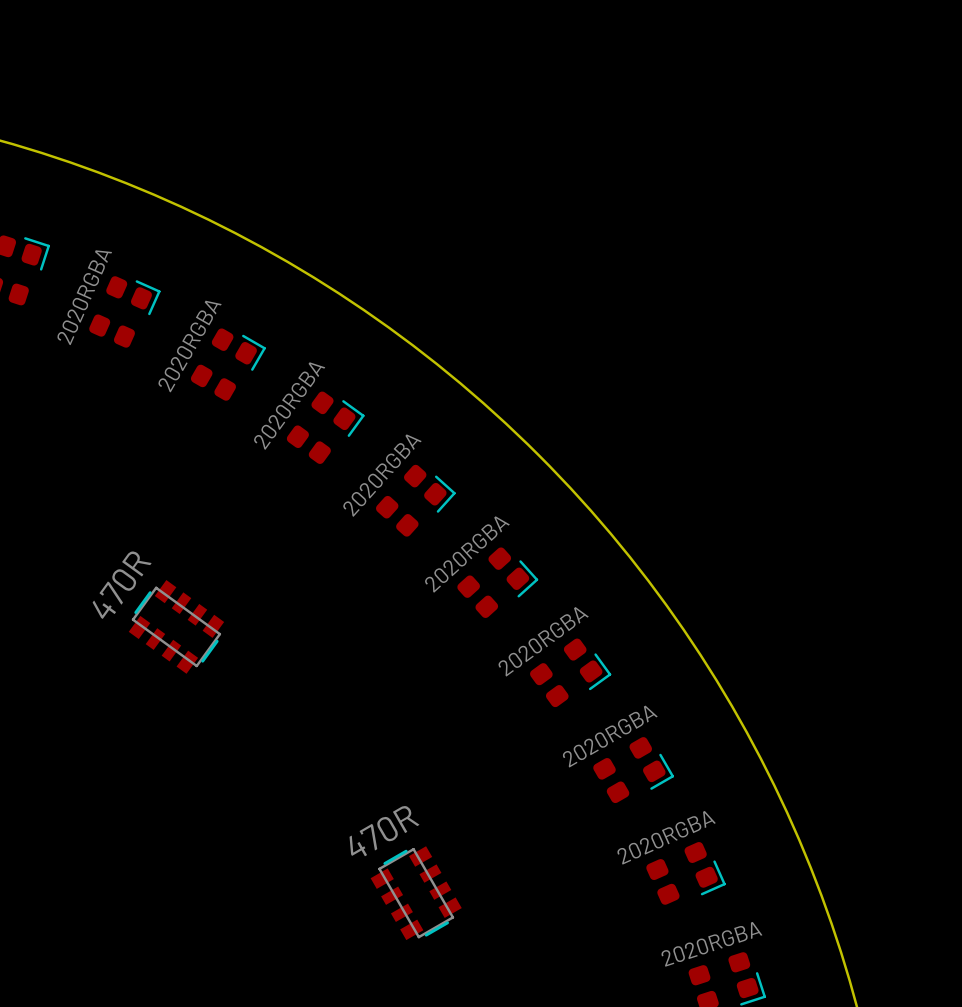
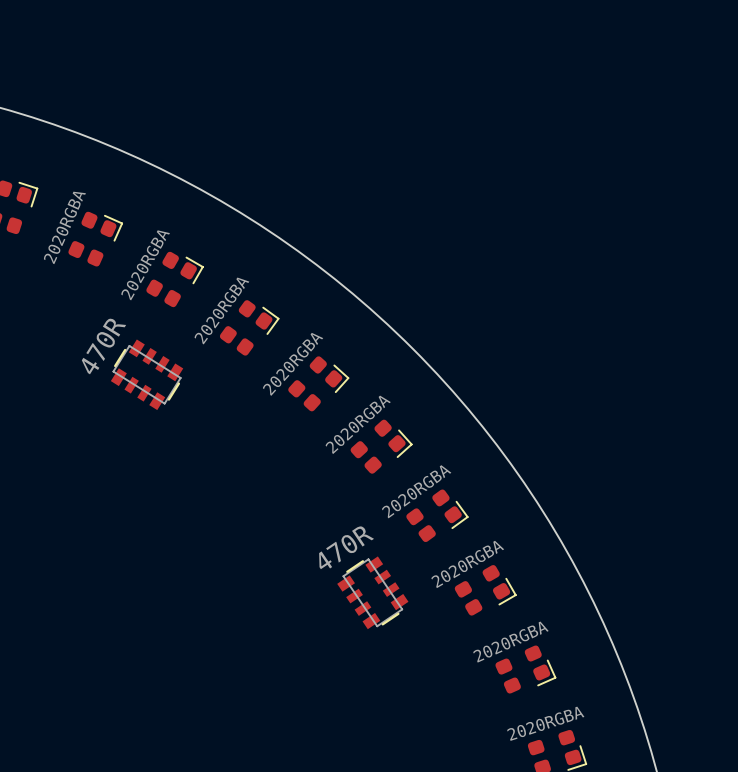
part: none -> 470R (147, 374)
part: 470R (176, 626) -> none
part: none -> 470R (372, 592)
part: 470R (416, 893) -> none

